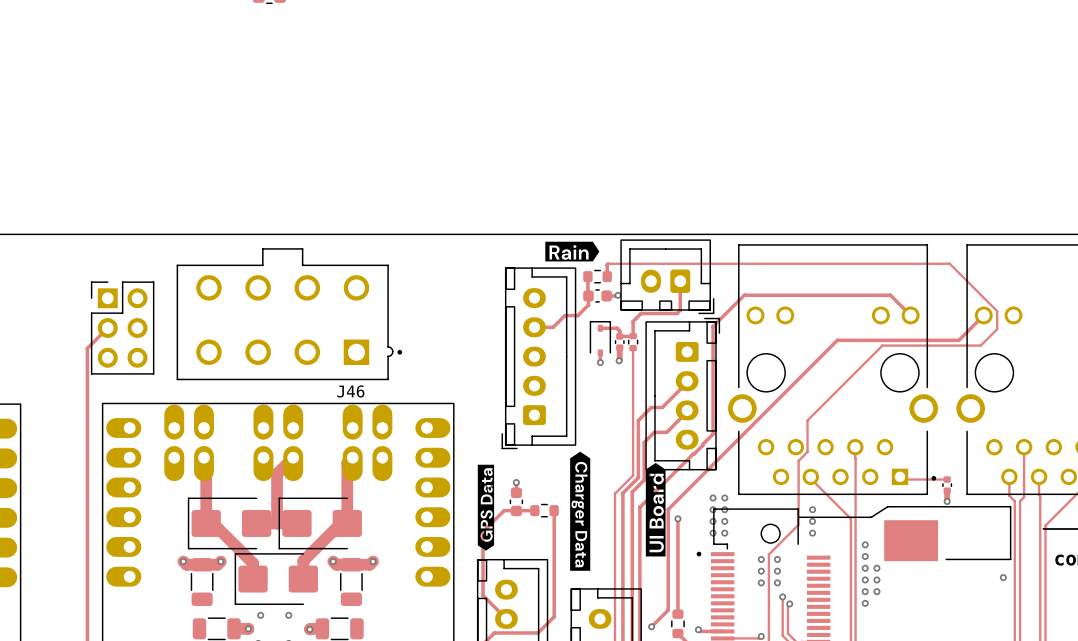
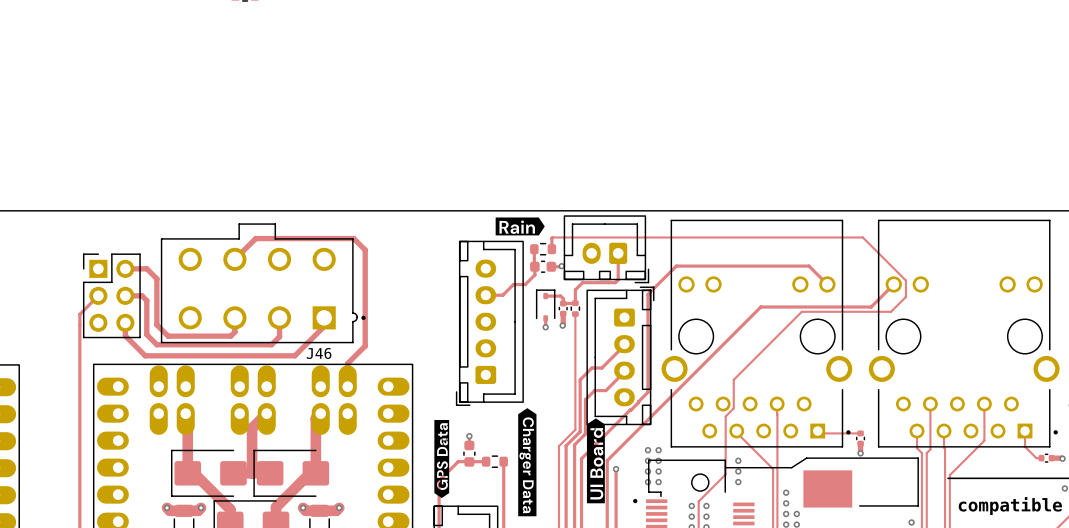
track: none -> (234, 259) (255, 238) (353, 238) (365, 250) (365, 346) (347, 363) (347, 386)
track: none -> (125, 268) (146, 268) (156, 278) (156, 324) (168, 336) (230, 336) (234, 332) (234, 317)
track: none -> (125, 295) (142, 295) (146, 300) (146, 334) (156, 344) (271, 344) (279, 336) (279, 317)
track: none -> (324, 317) (324, 326) (294, 355) (145, 355) (125, 335) (125, 322)

